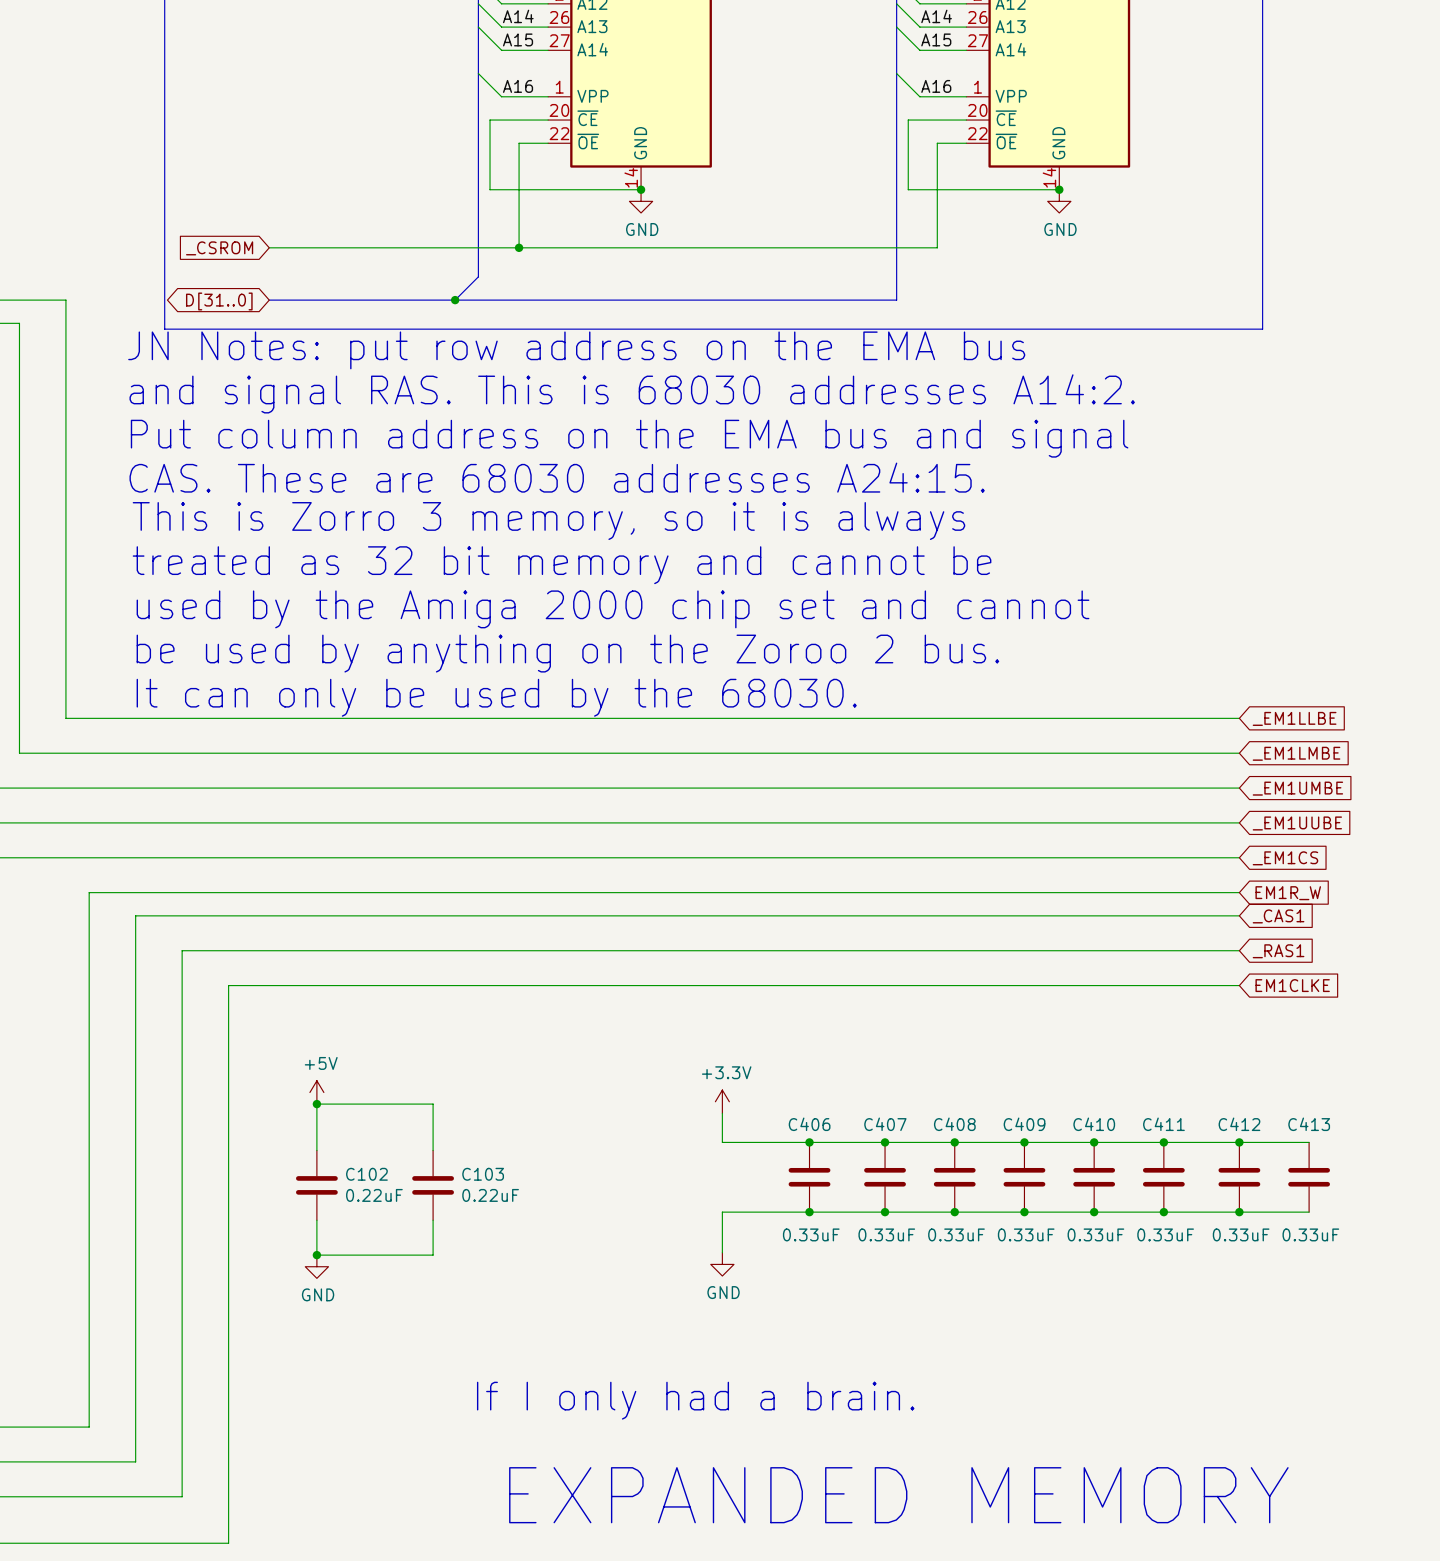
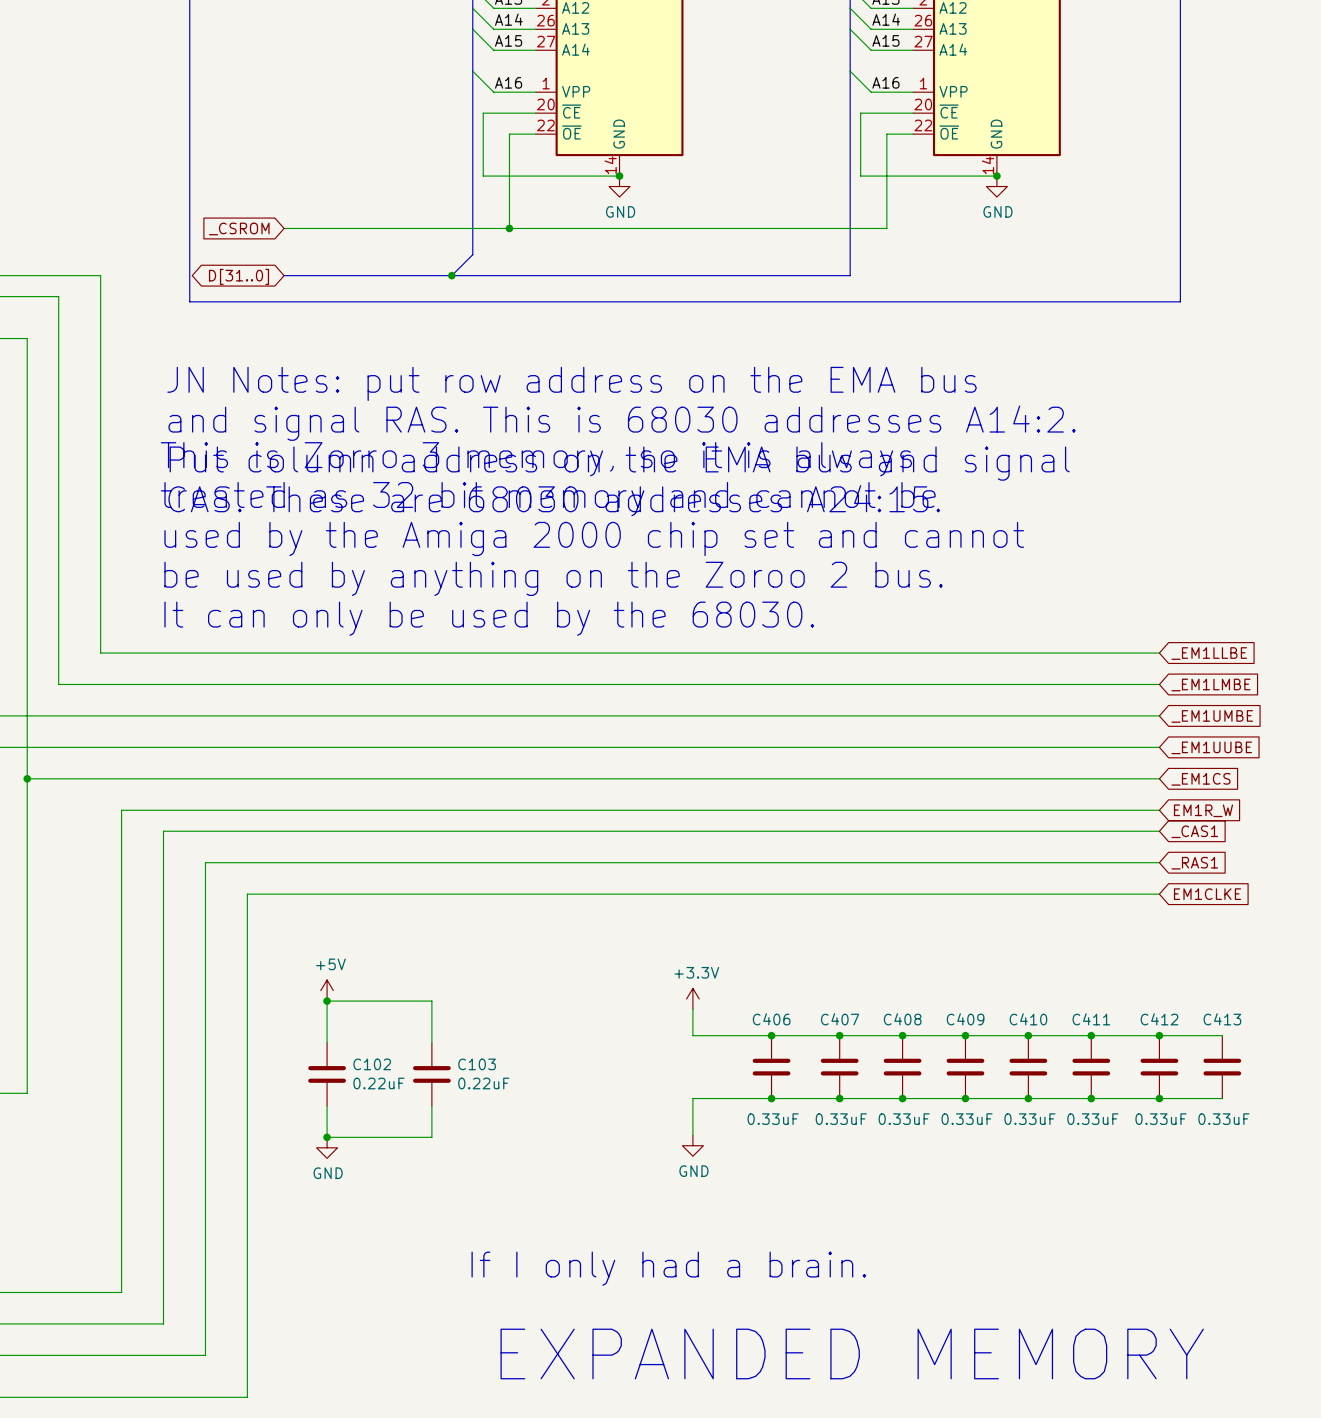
text position: JN Notes: put row address on the EMA bus (576, 350) -> JN Notes: put row address on the EMA bus (571, 383)
text position: and signal RAS. This is 68030 addresses A14:2. (632, 393) -> and signal RAS. This is 68030 addresses A14:2. (622, 423)
text position: Put column address on the EMA bus and signal (629, 438) -> Put column address on the EMA bus and signal (619, 463)
text position: CAS. These are 68030 addresses A24:15. (557, 477) -> CAS. These are 68030 addresses A24:15. (554, 498)
text position: This is Zorro 3 memory, so it is always (548, 521) -> This is Zorro 3 memory, so it is always (536, 459)
text position: treated as 32 bit memory and cannot be (562, 565) -> treated as 32 bit memory and cannot be (548, 499)
text position: used by the Amiga 2000 chip set and cannot (613, 609) -> used by the Amiga 2000 chip set and cannot (594, 538)
text position: be used by anything on the Zoroo 2 bus. (567, 653) -> be used by anything on the Zoroo 2 bus. (553, 578)
text position: It can only be used by the 68030. (496, 697) -> It can only be used by the 68030. (489, 618)

